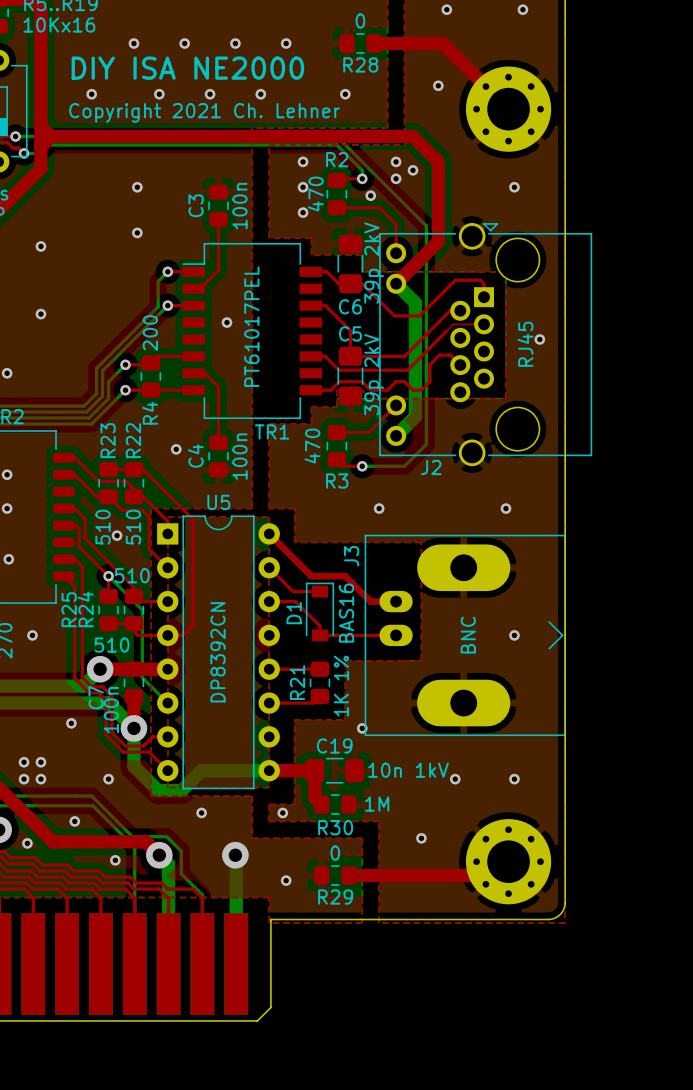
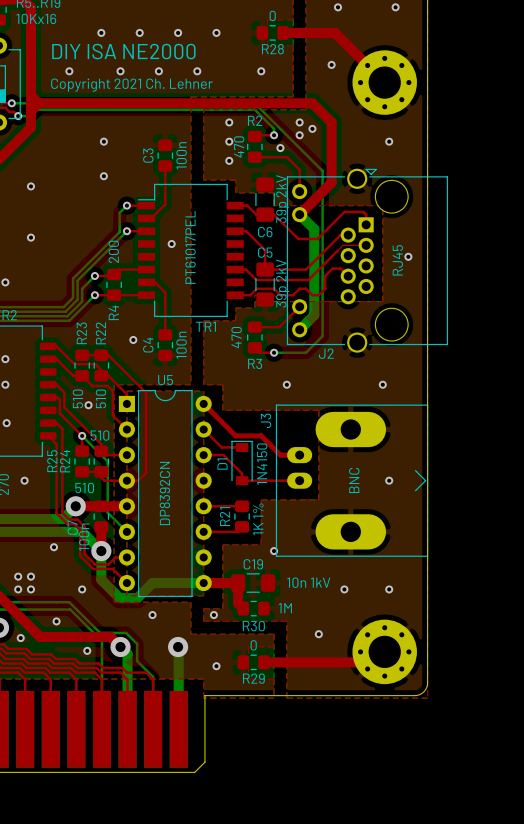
D1 value: BAS16 (346, 613) -> 1N4150 (262, 464)

